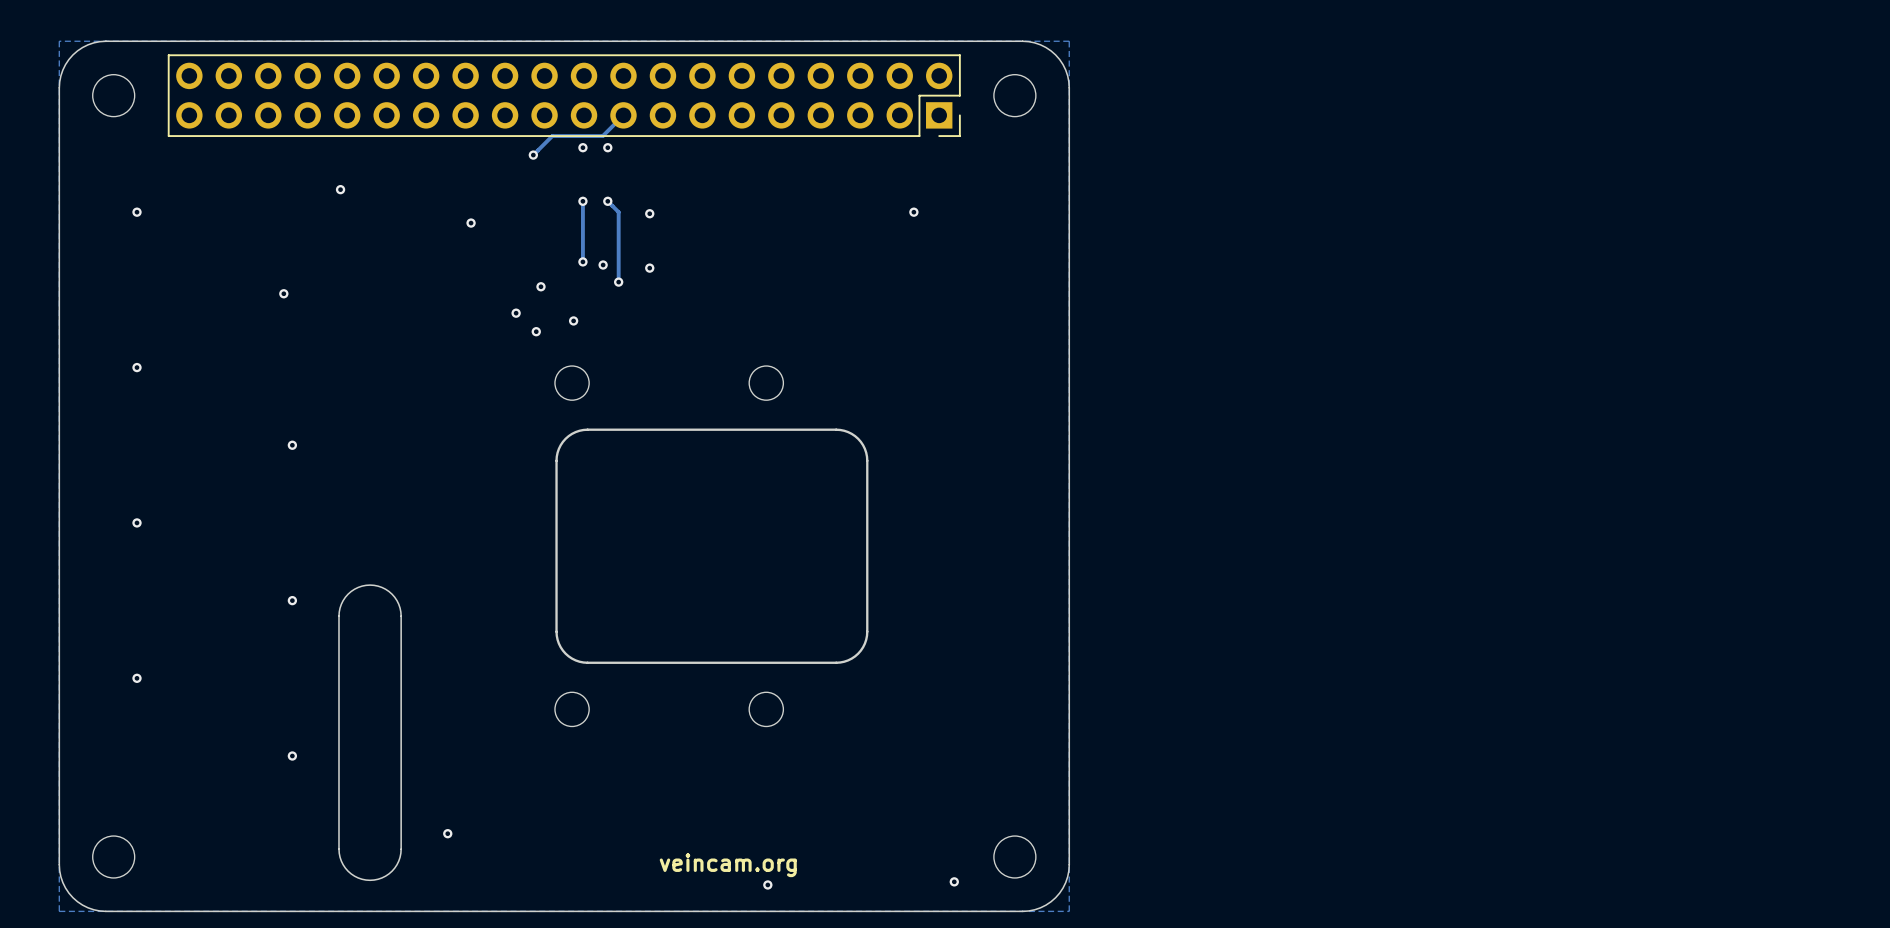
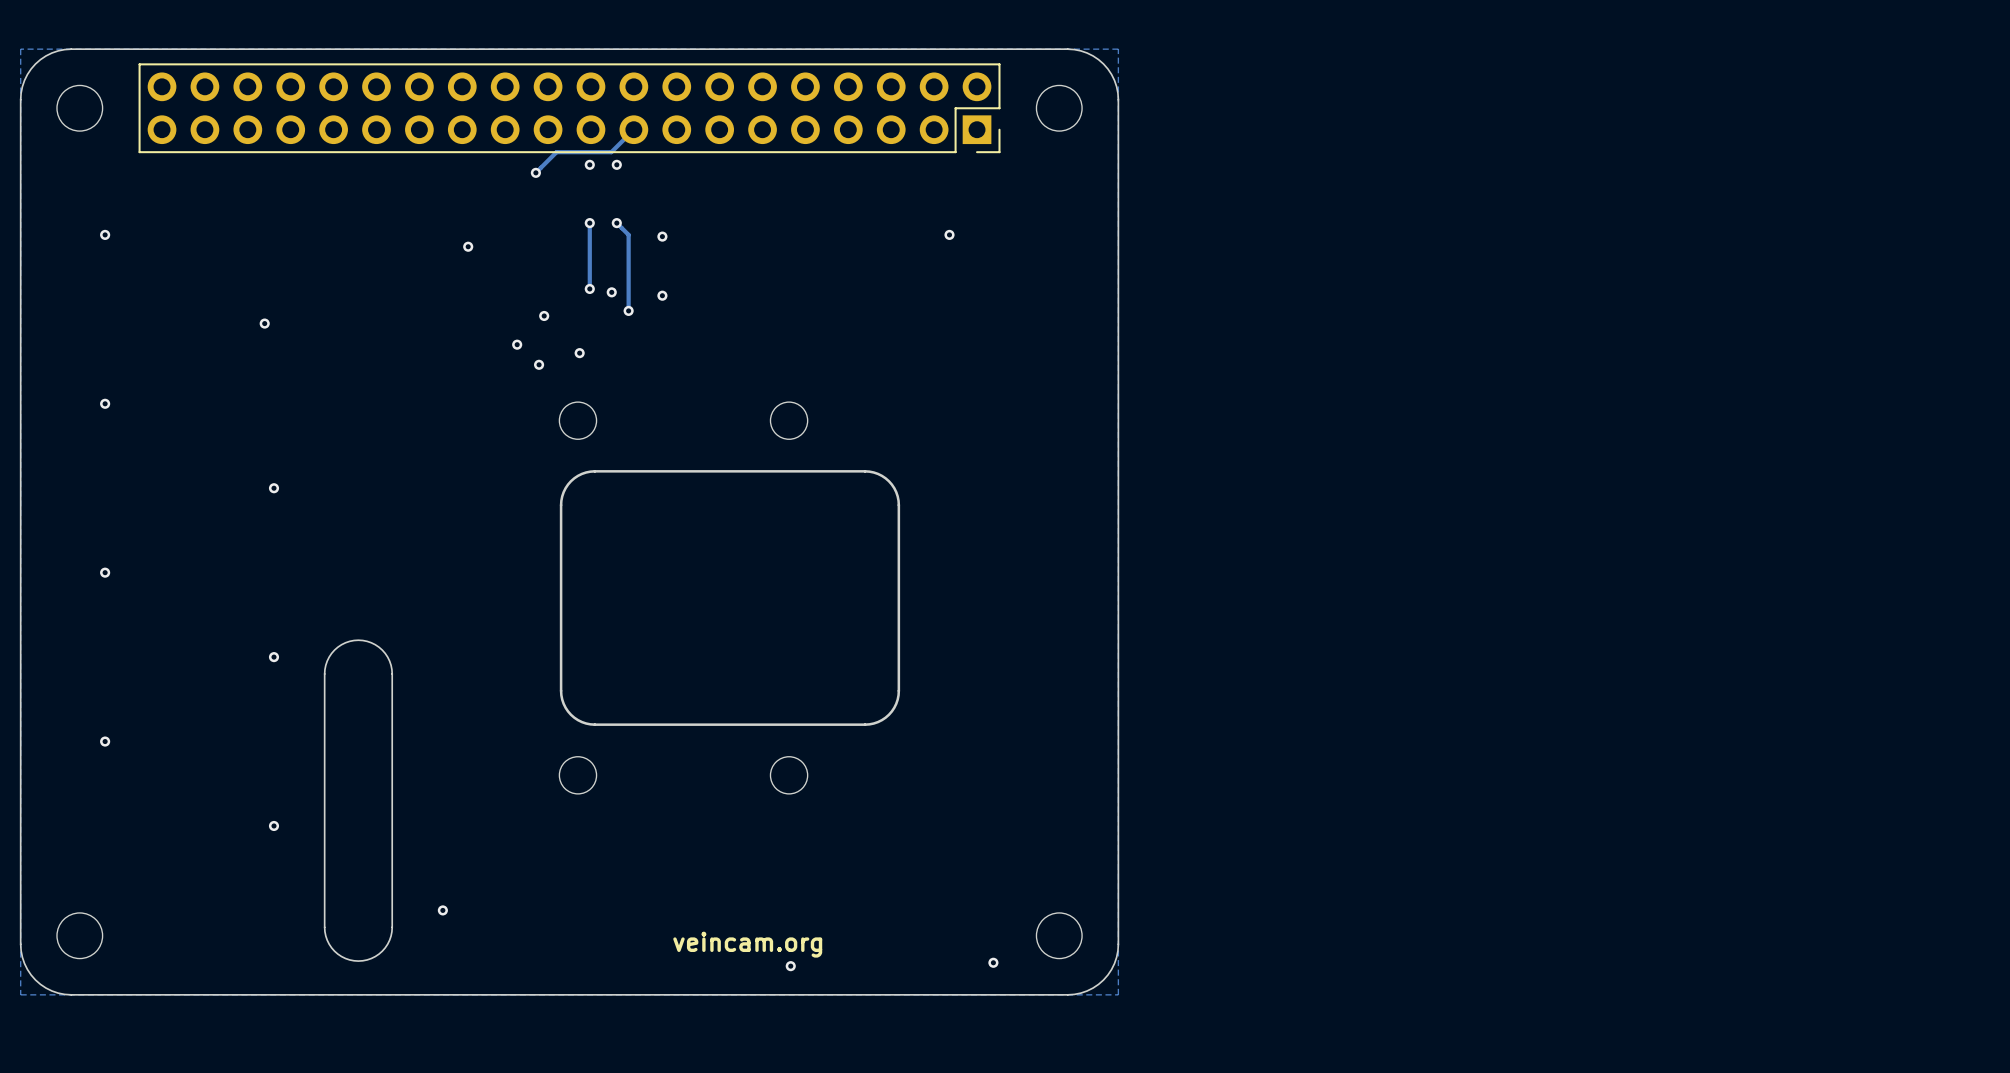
via: (340, 189) -> none

